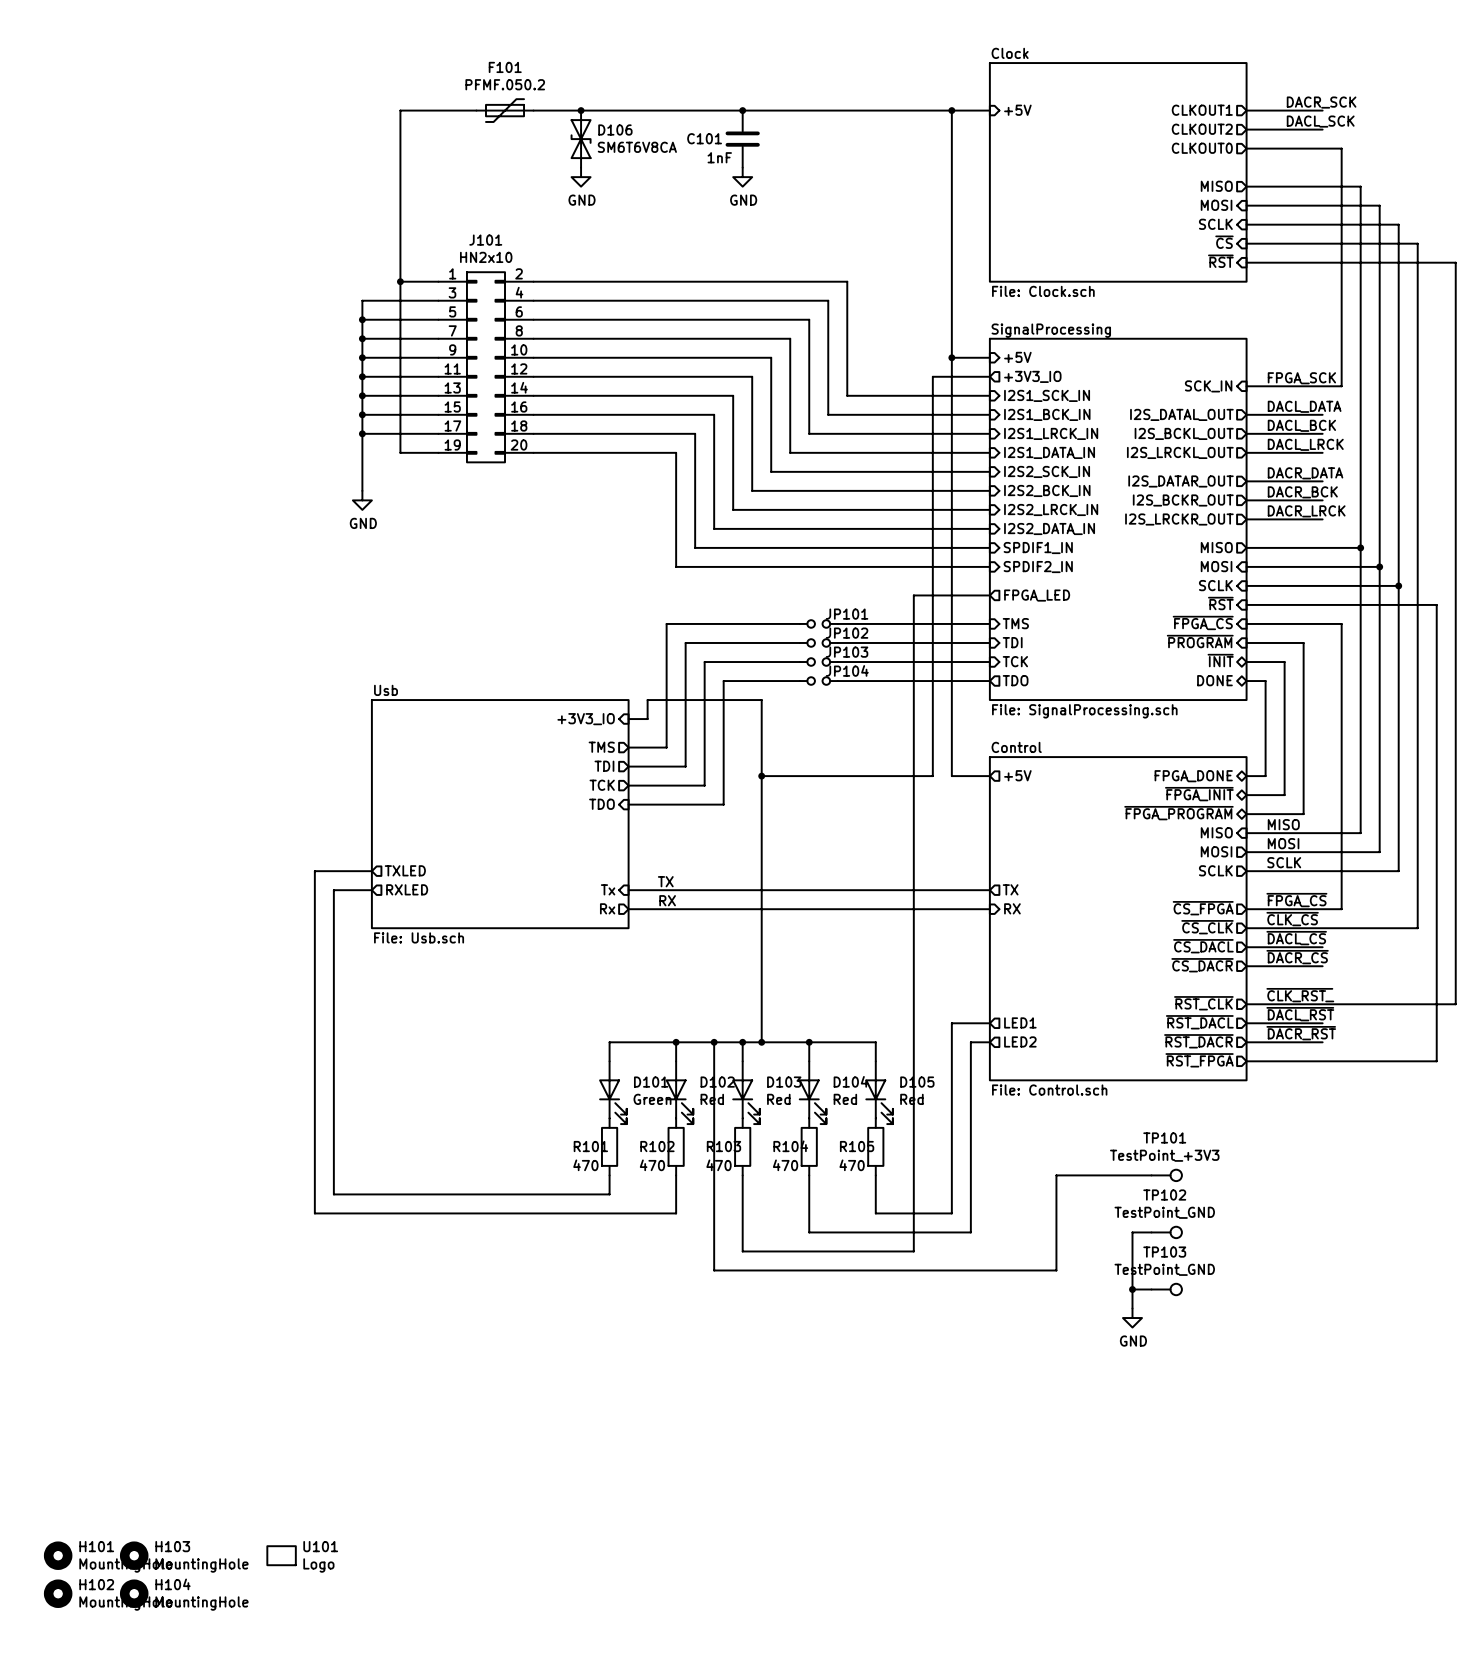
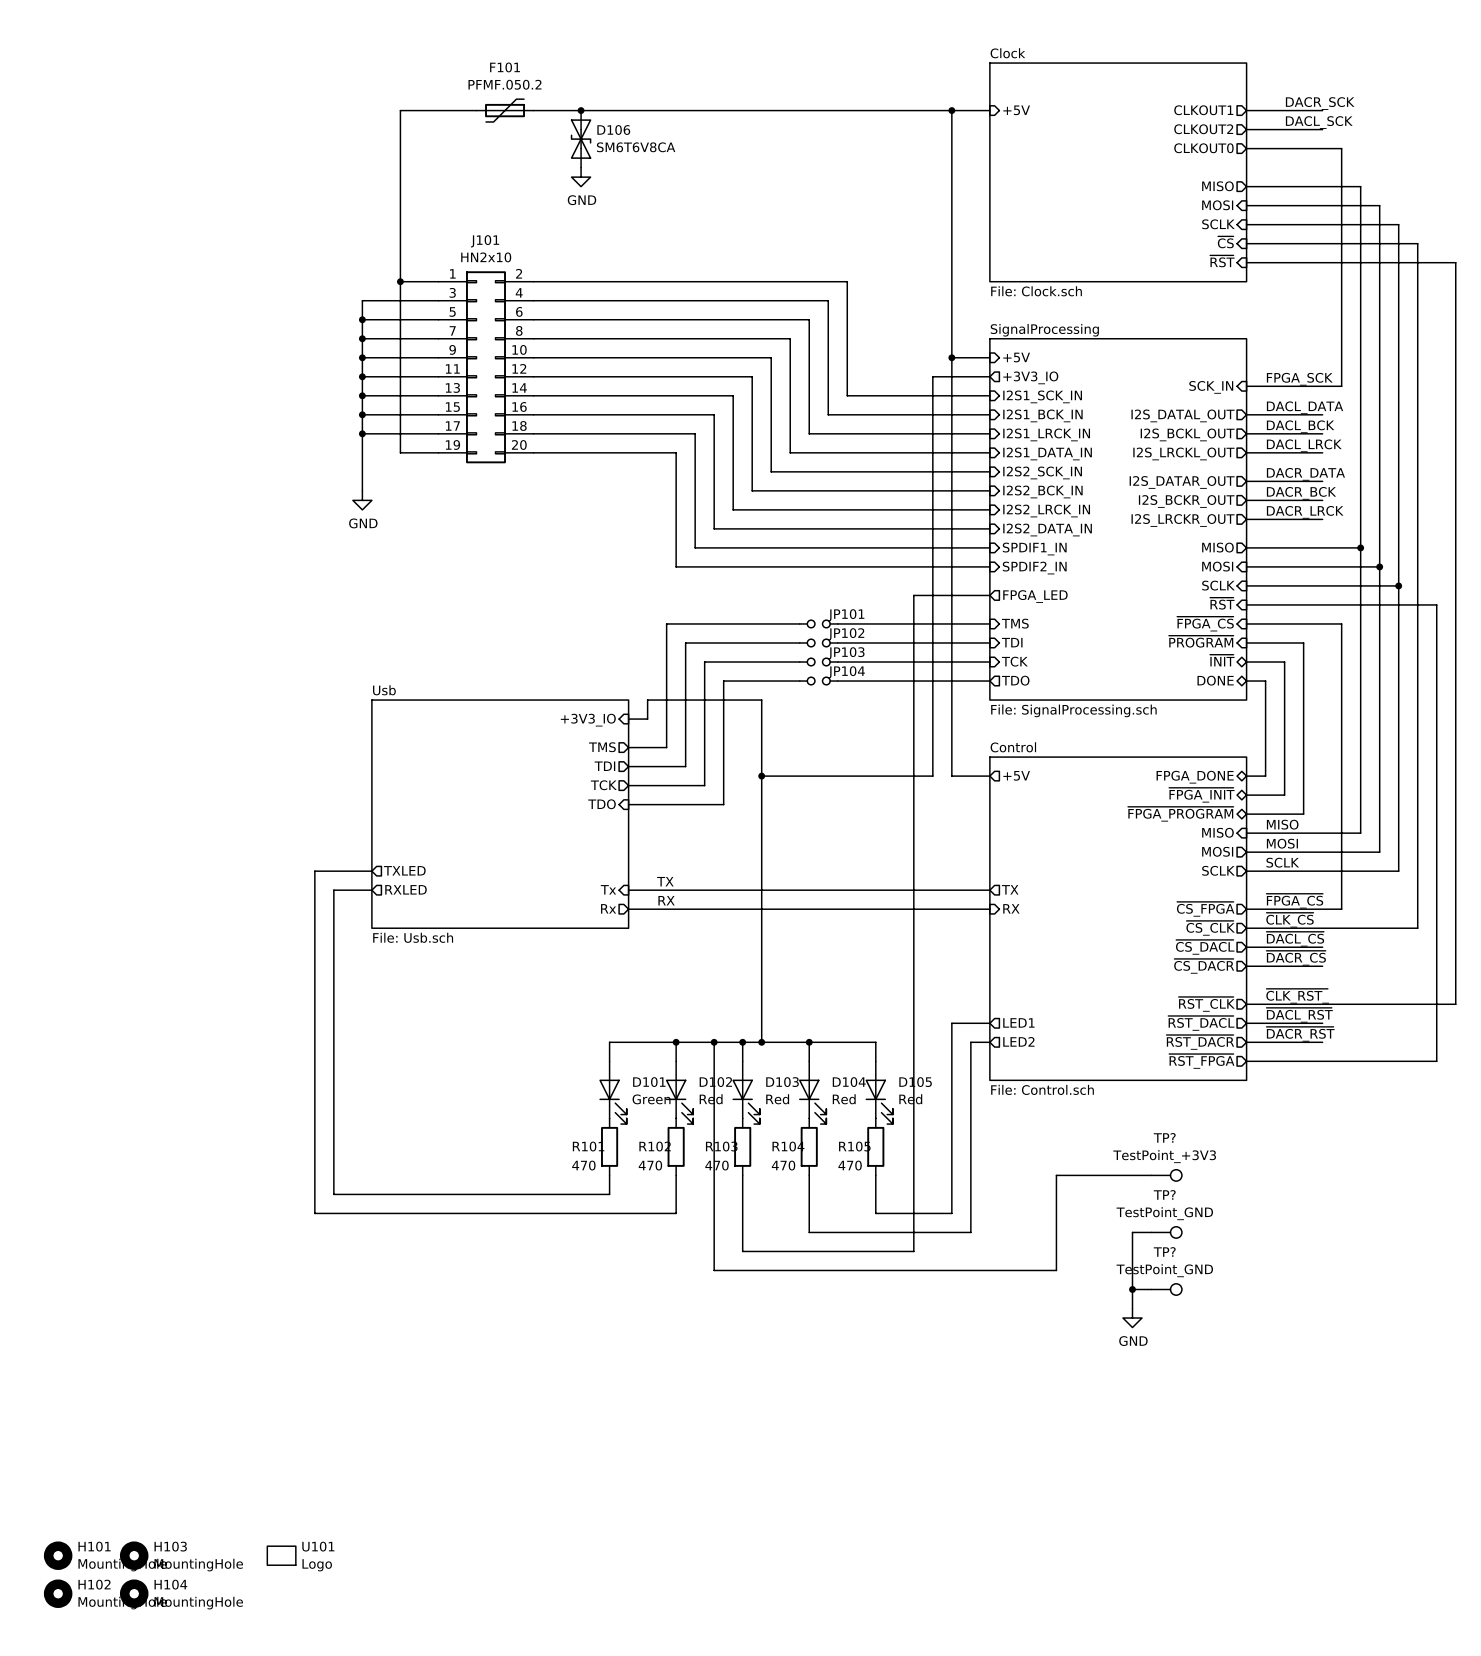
junction: (742, 110) -> none
C101: 1nF (742, 139) -> none
power symbol: GND (742, 177) -> none
TP101 name: TP101 (1164, 1137) -> TP? (1164, 1137)
TP102 name: TP102 (1164, 1195) -> TP? (1164, 1194)
TP103 name: TP103 (1164, 1252) -> TP? (1164, 1251)

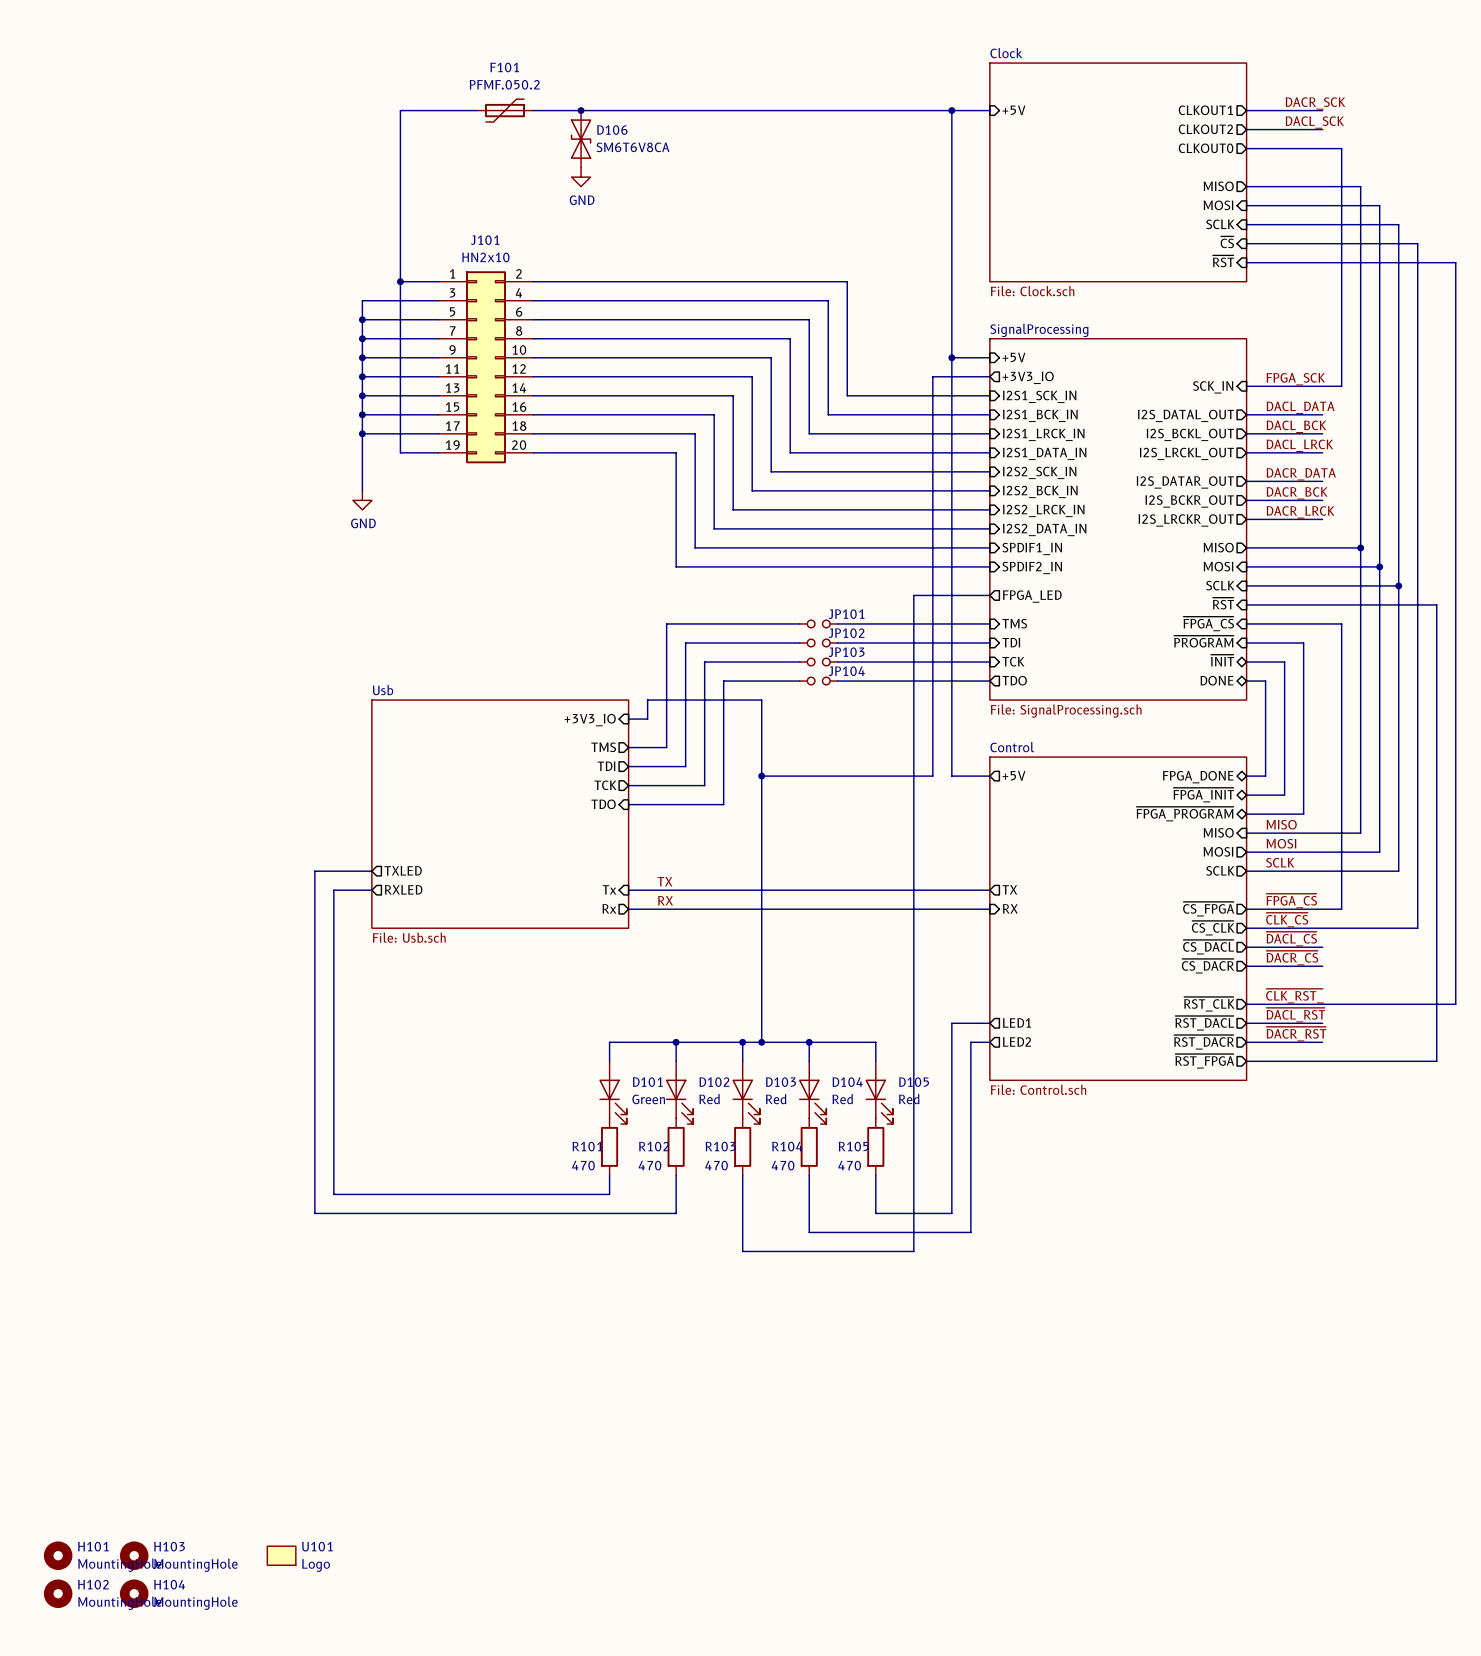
wire: (714, 1042) (714, 1270) (1056, 1270) (1056, 1175) (1151, 1175) -> none
junction: (714, 1042) -> none
TP?: TestPoint_+3V3 (1166, 1175) -> none
wire: (1151, 1232) (1132, 1232) (1132, 1308) -> none
TP?: TestPoint_GND (1166, 1232) -> none
wire: (1132, 1289) (1151, 1289) -> none
junction: (1132, 1289) -> none
TP?: TestPoint_GND (1166, 1289) -> none
power symbol: GND (1132, 1318) -> none

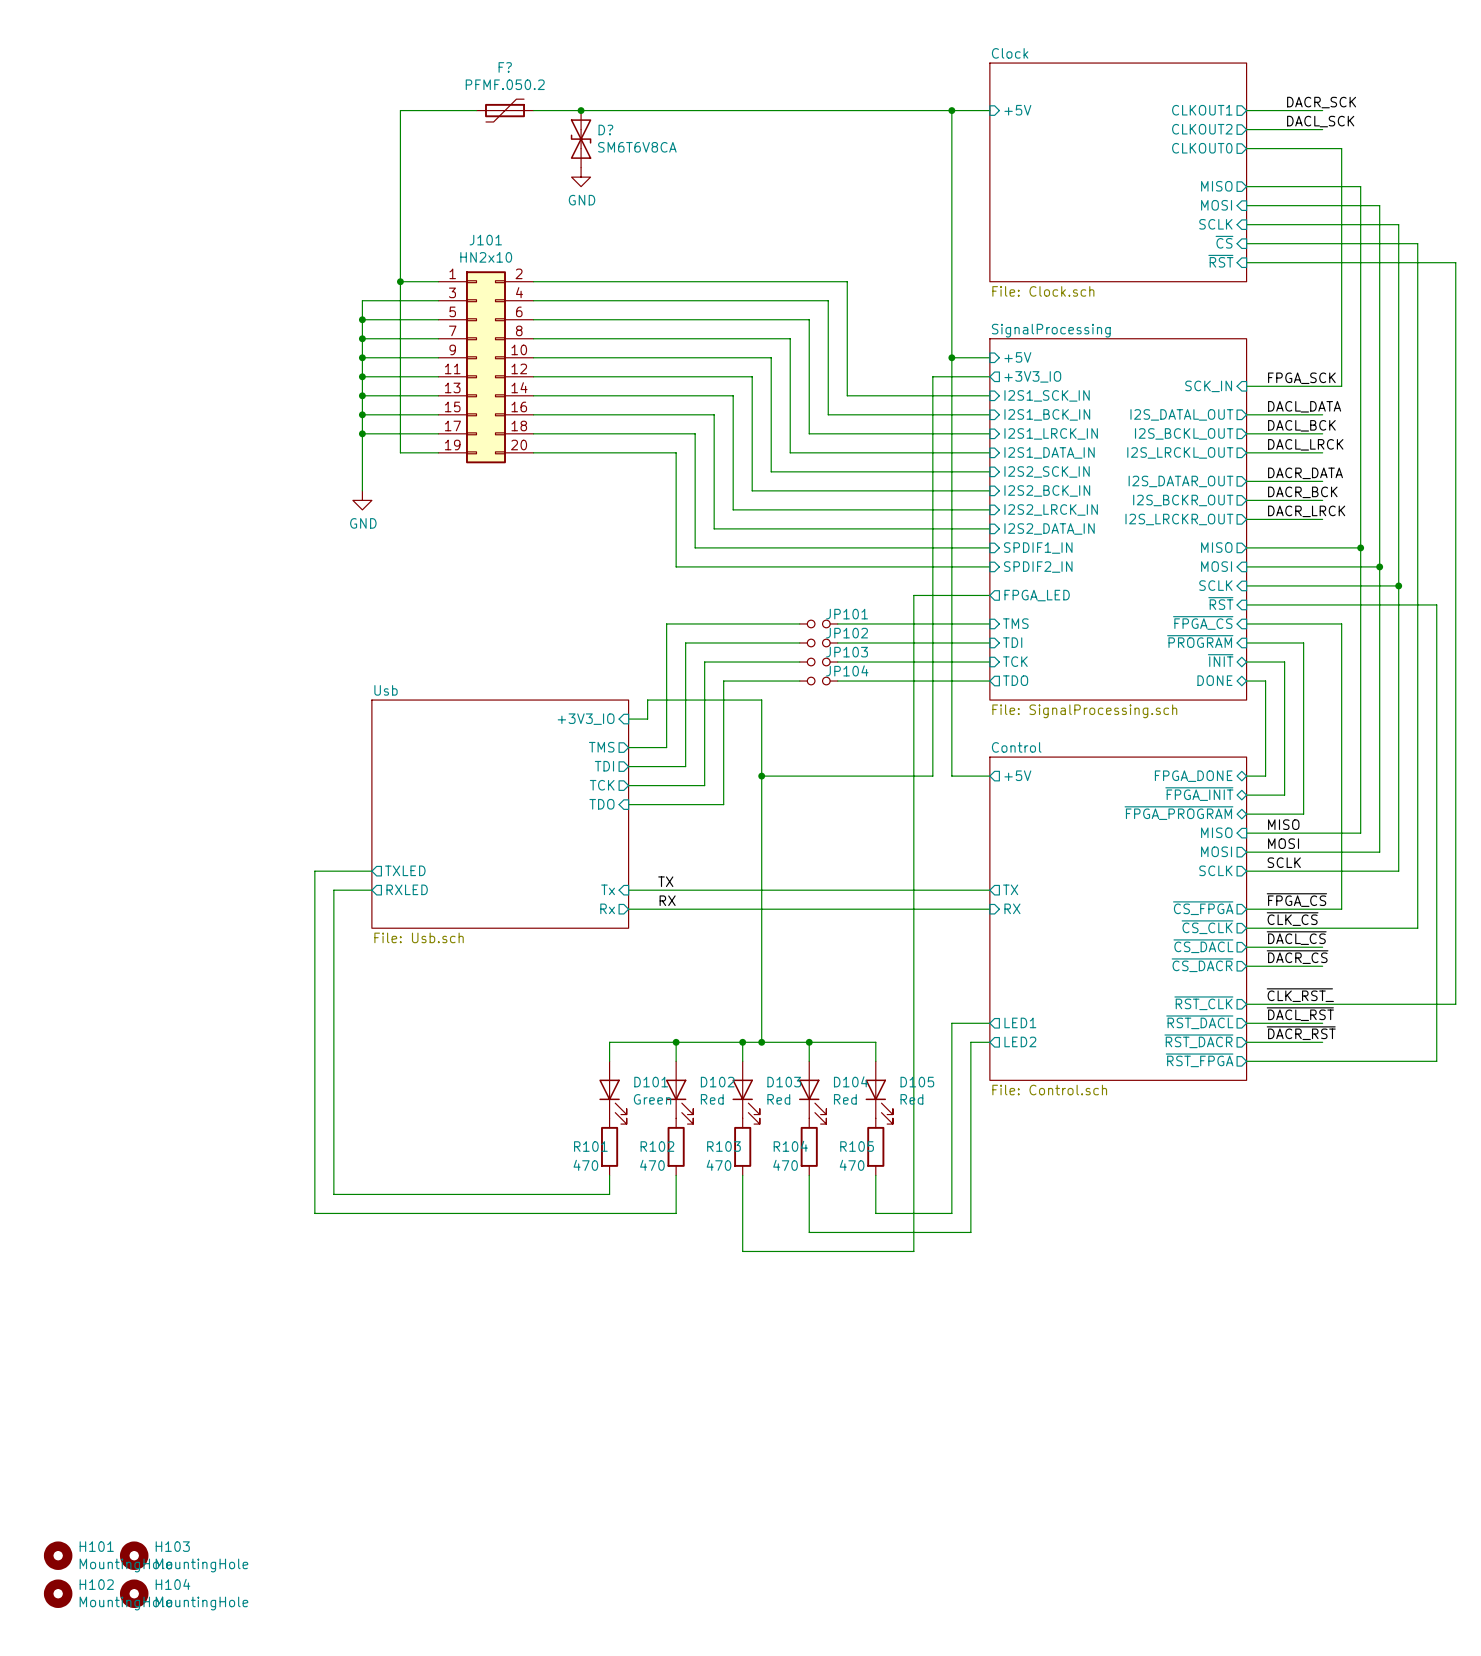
F101 name: F101 (504, 67) -> F? (505, 67)
D106 name: D106 (612, 130) -> D? (605, 129)
U101: Logo (281, 1555) -> none

